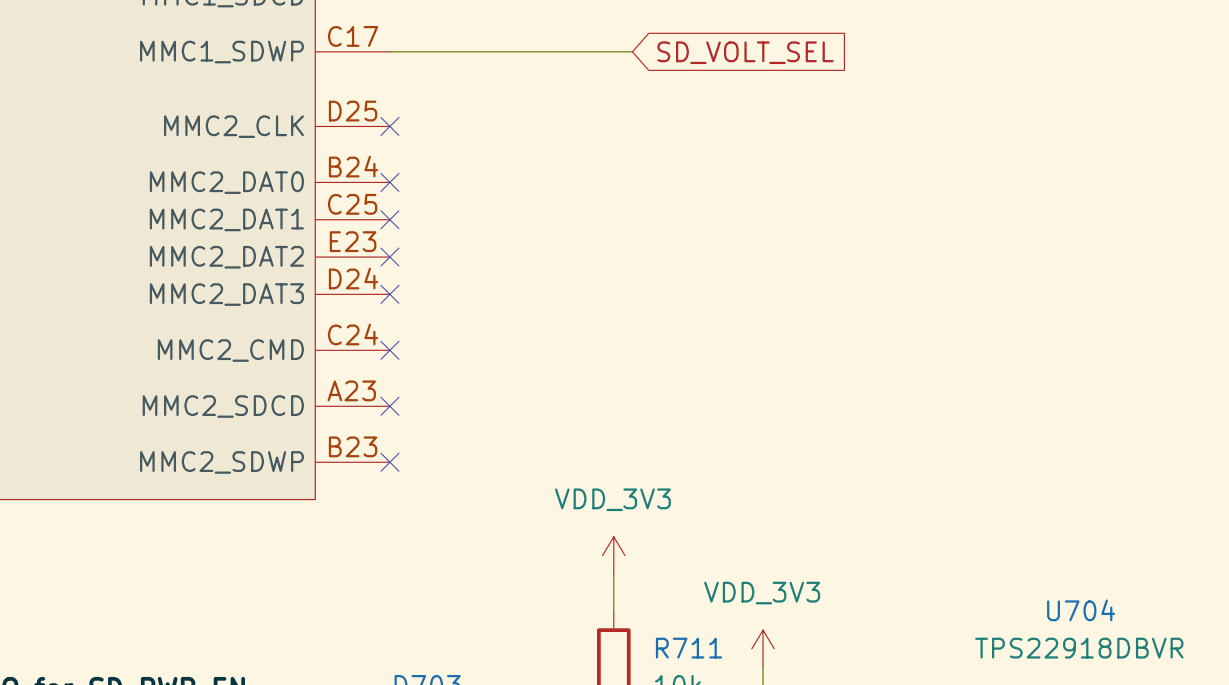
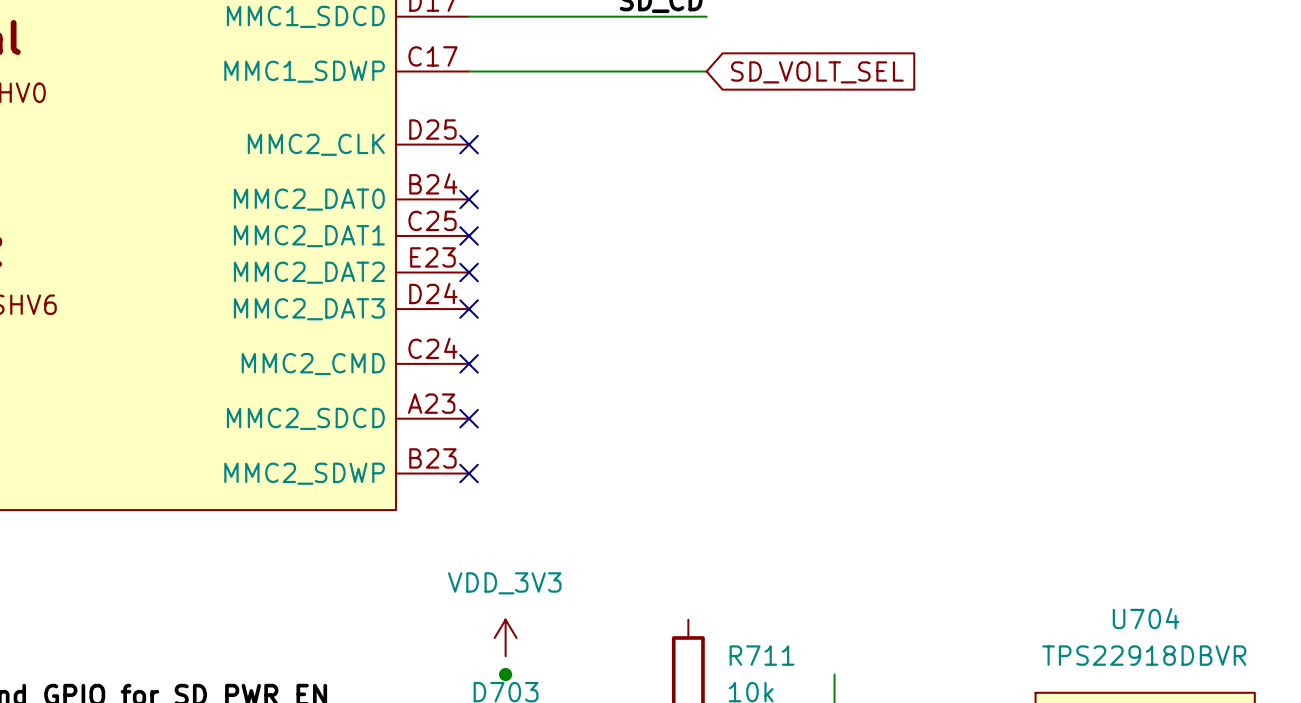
power symbol: VDD_3V3 (613, 555) -> none
wire: (613, 574) (613, 611) -> none
power symbol: none -> VDD_3V3 (505, 637)
power symbol: VDD_3V3 (763, 648) -> none
junction: none -> (505, 674)

